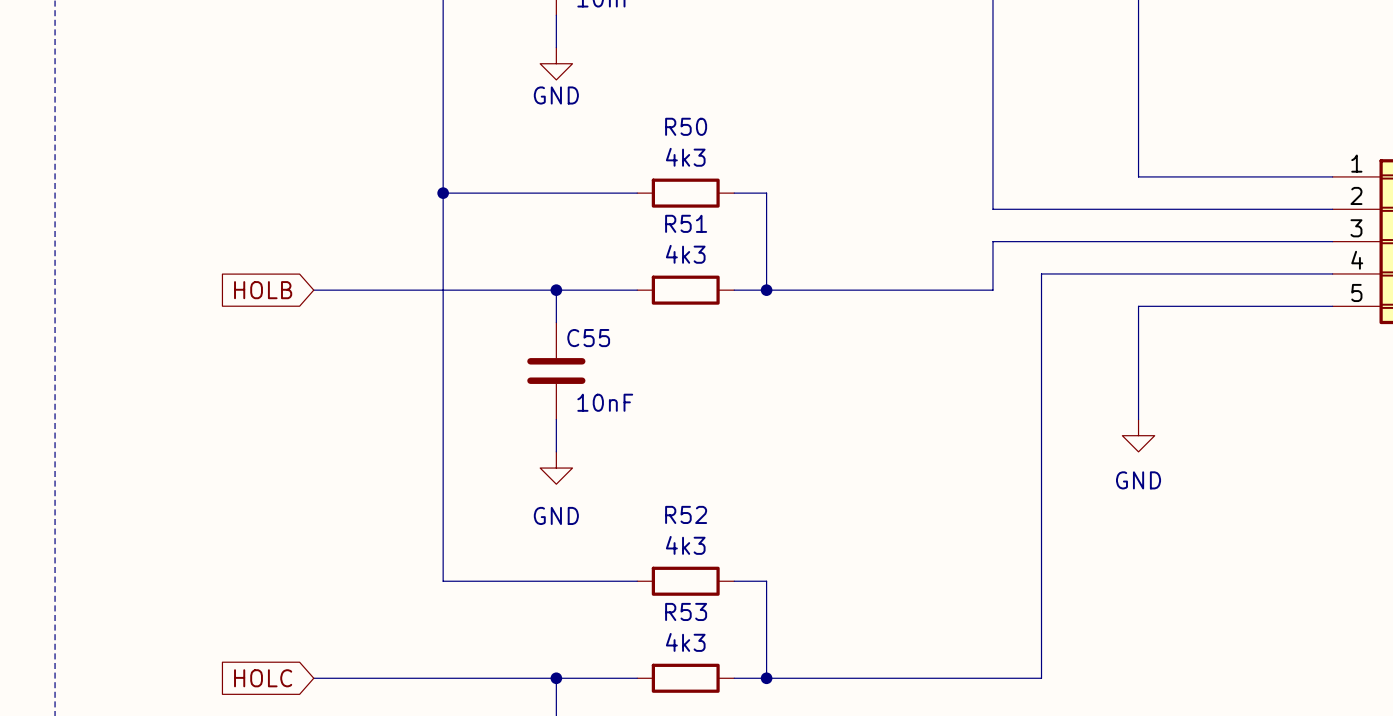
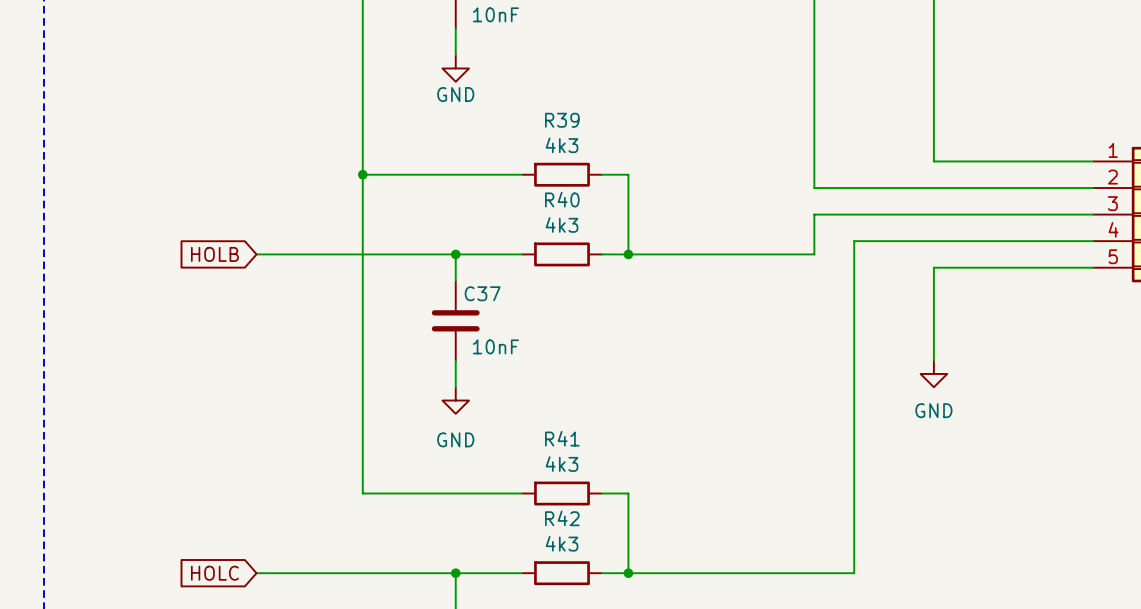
R50 name: R50 (686, 126) -> R39 (562, 120)
R51 name: R51 (686, 223) -> R40 (562, 199)
C55 name: C55 (588, 338) -> C37 (482, 293)
R52 name: R52 (686, 514) -> R41 (562, 438)
R53 name: R53 (686, 611) -> R42 (562, 518)

